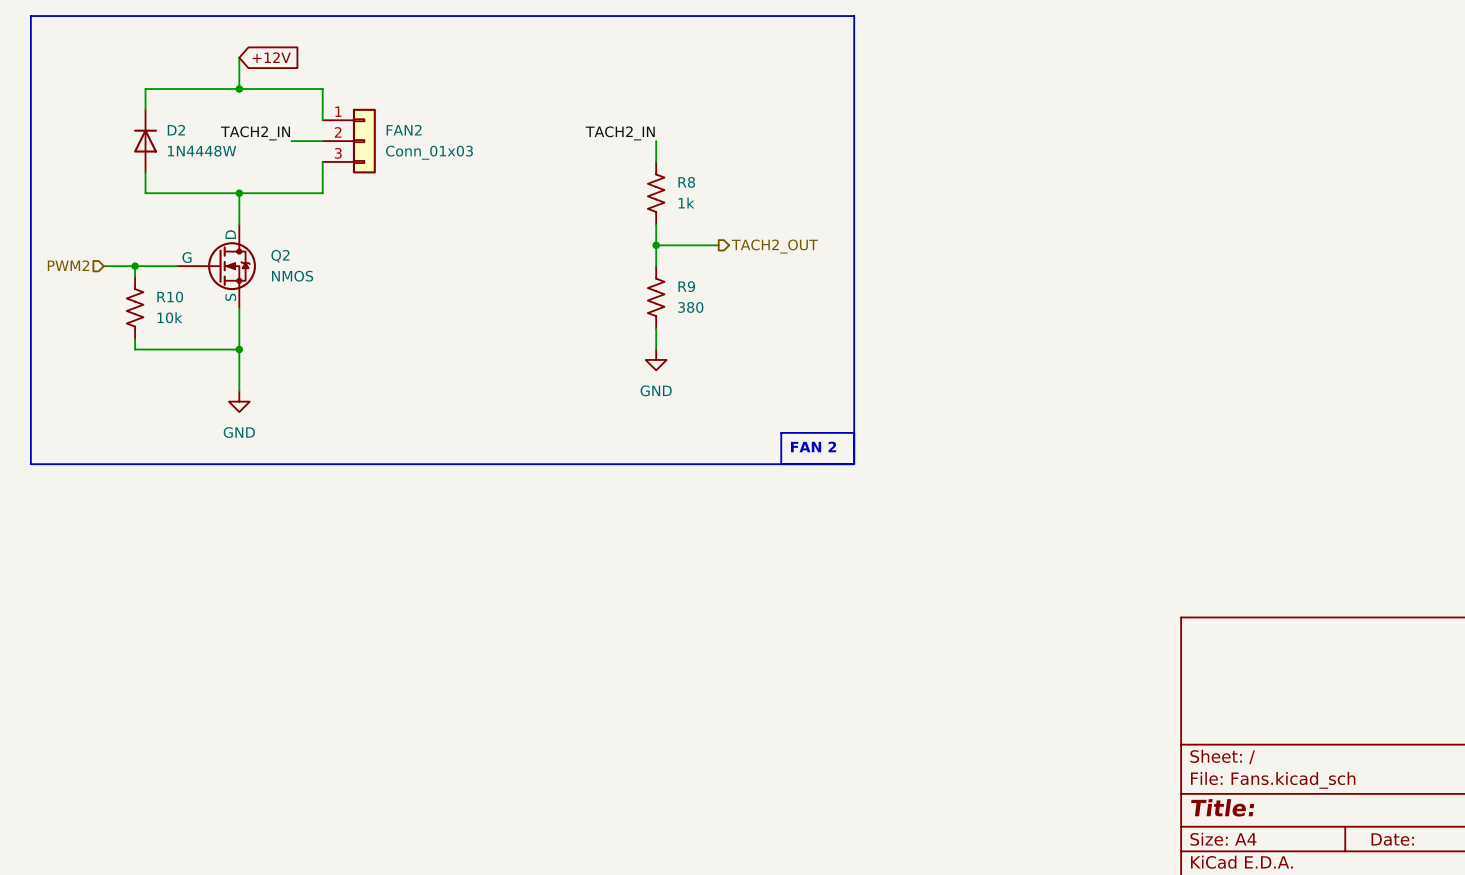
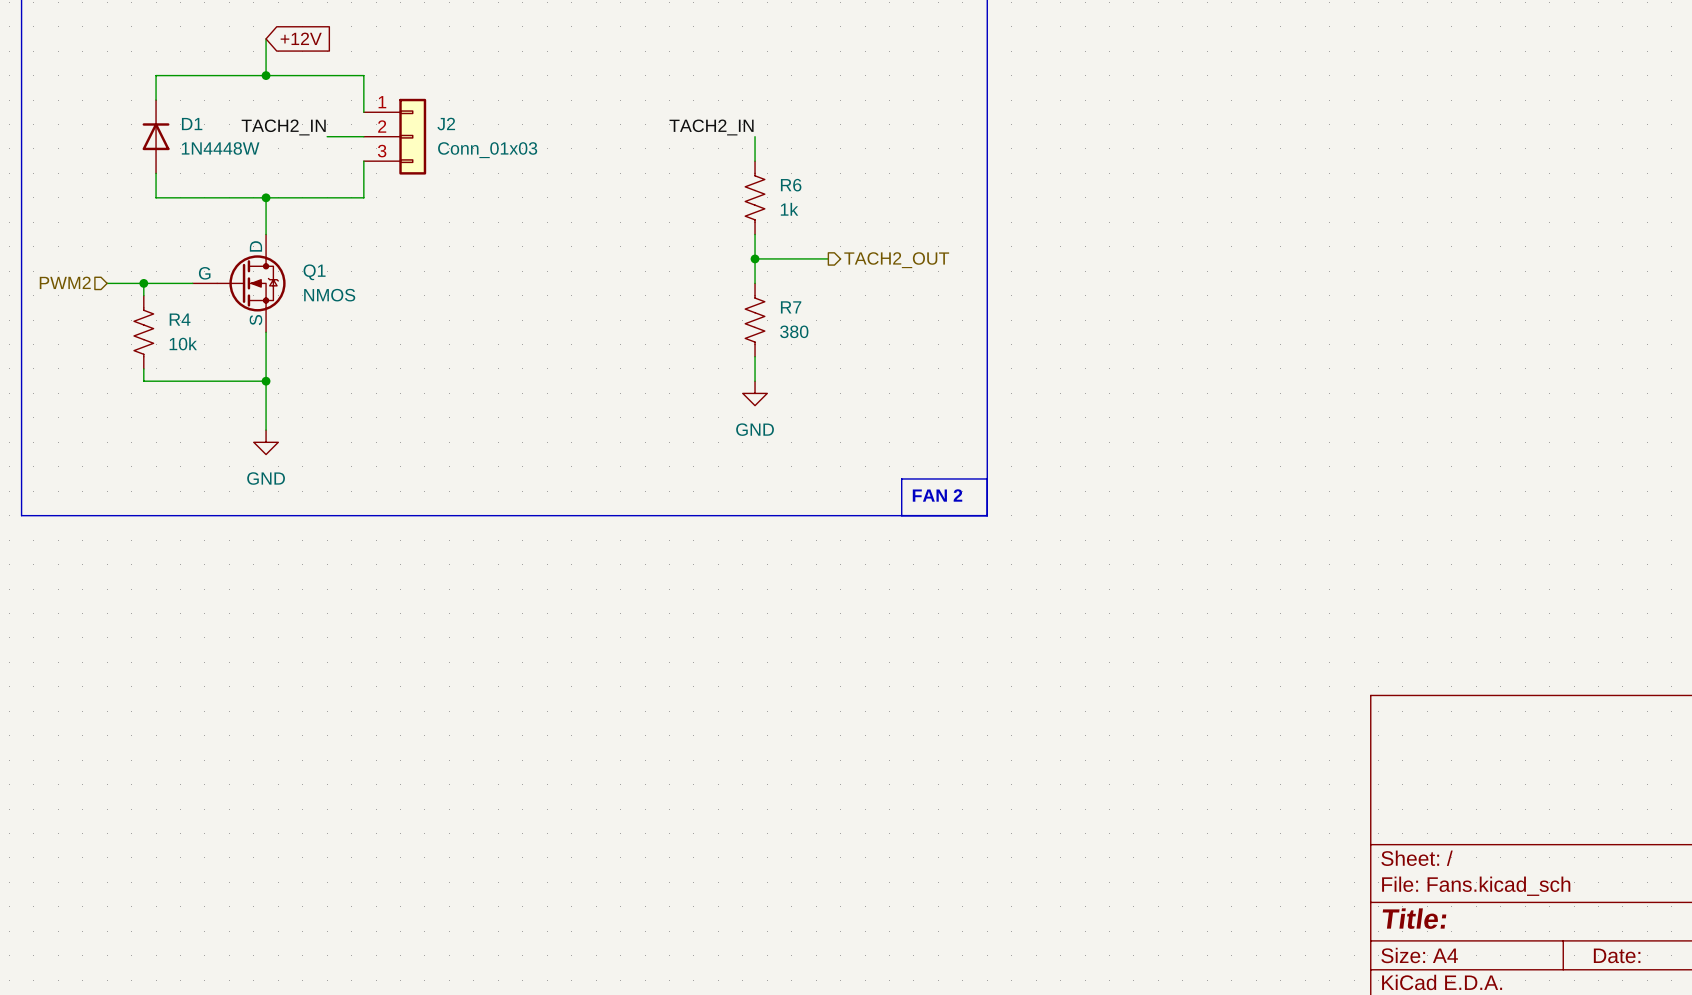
D2 name: D2 (176, 130) -> D1 (192, 124)
FAN2 name: FAN2 (404, 130) -> J2 (446, 124)
R8 name: R8 (686, 182) -> R6 (791, 185)
Q2 name: Q2 (280, 256) -> Q1 (314, 272)
R9 name: R9 (686, 286) -> R7 (791, 307)
R10 name: R10 (170, 297) -> R4 (180, 319)

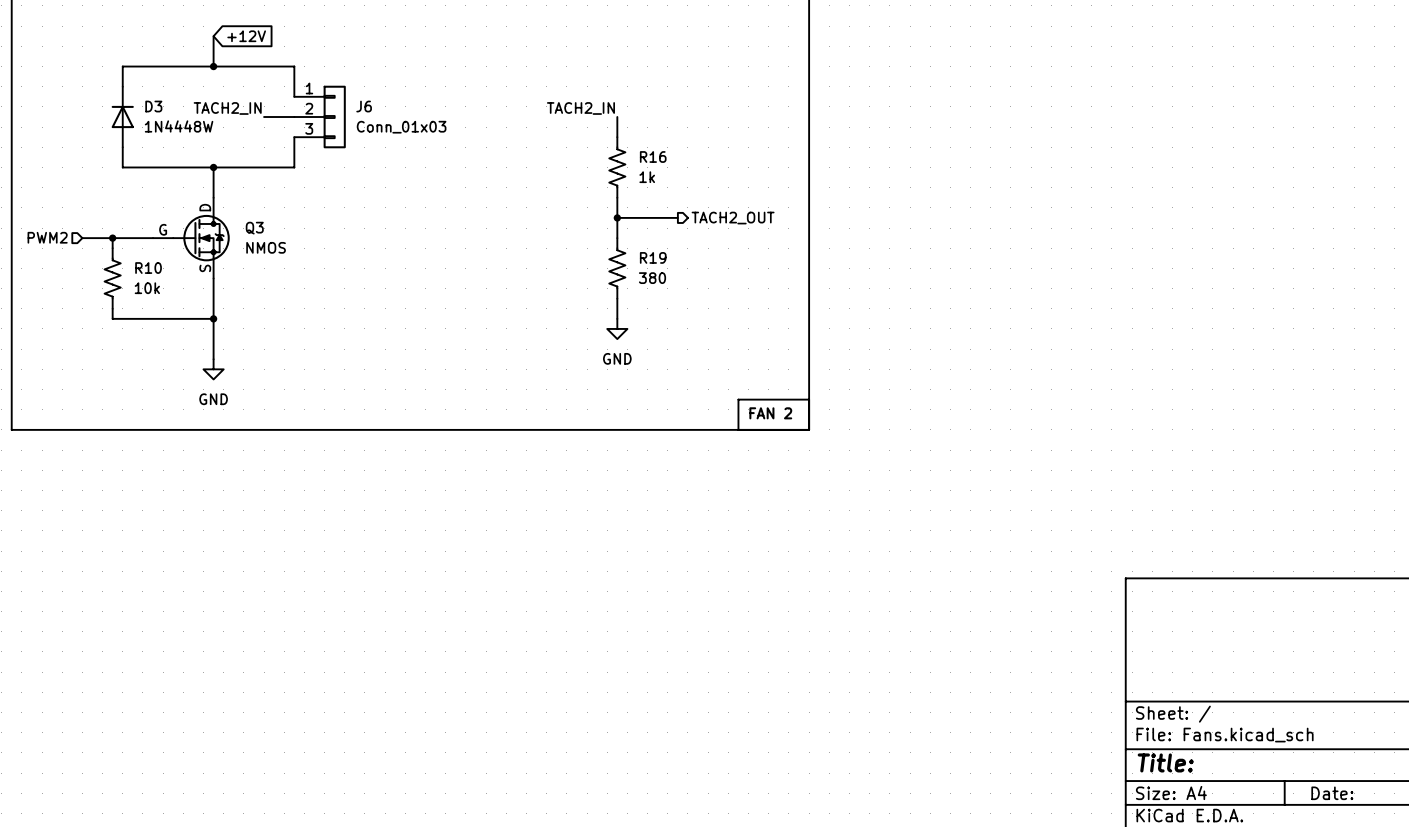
D1 name: D1 (192, 124) -> D3 (153, 106)
J2 name: J2 (446, 124) -> J6 (364, 106)
R6 name: R6 (791, 185) -> R16 (653, 157)
Q1 name: Q1 (314, 272) -> Q3 (254, 228)
R7 name: R7 (791, 307) -> R19 (653, 257)
R4 name: R4 (180, 319) -> R10 (148, 268)

